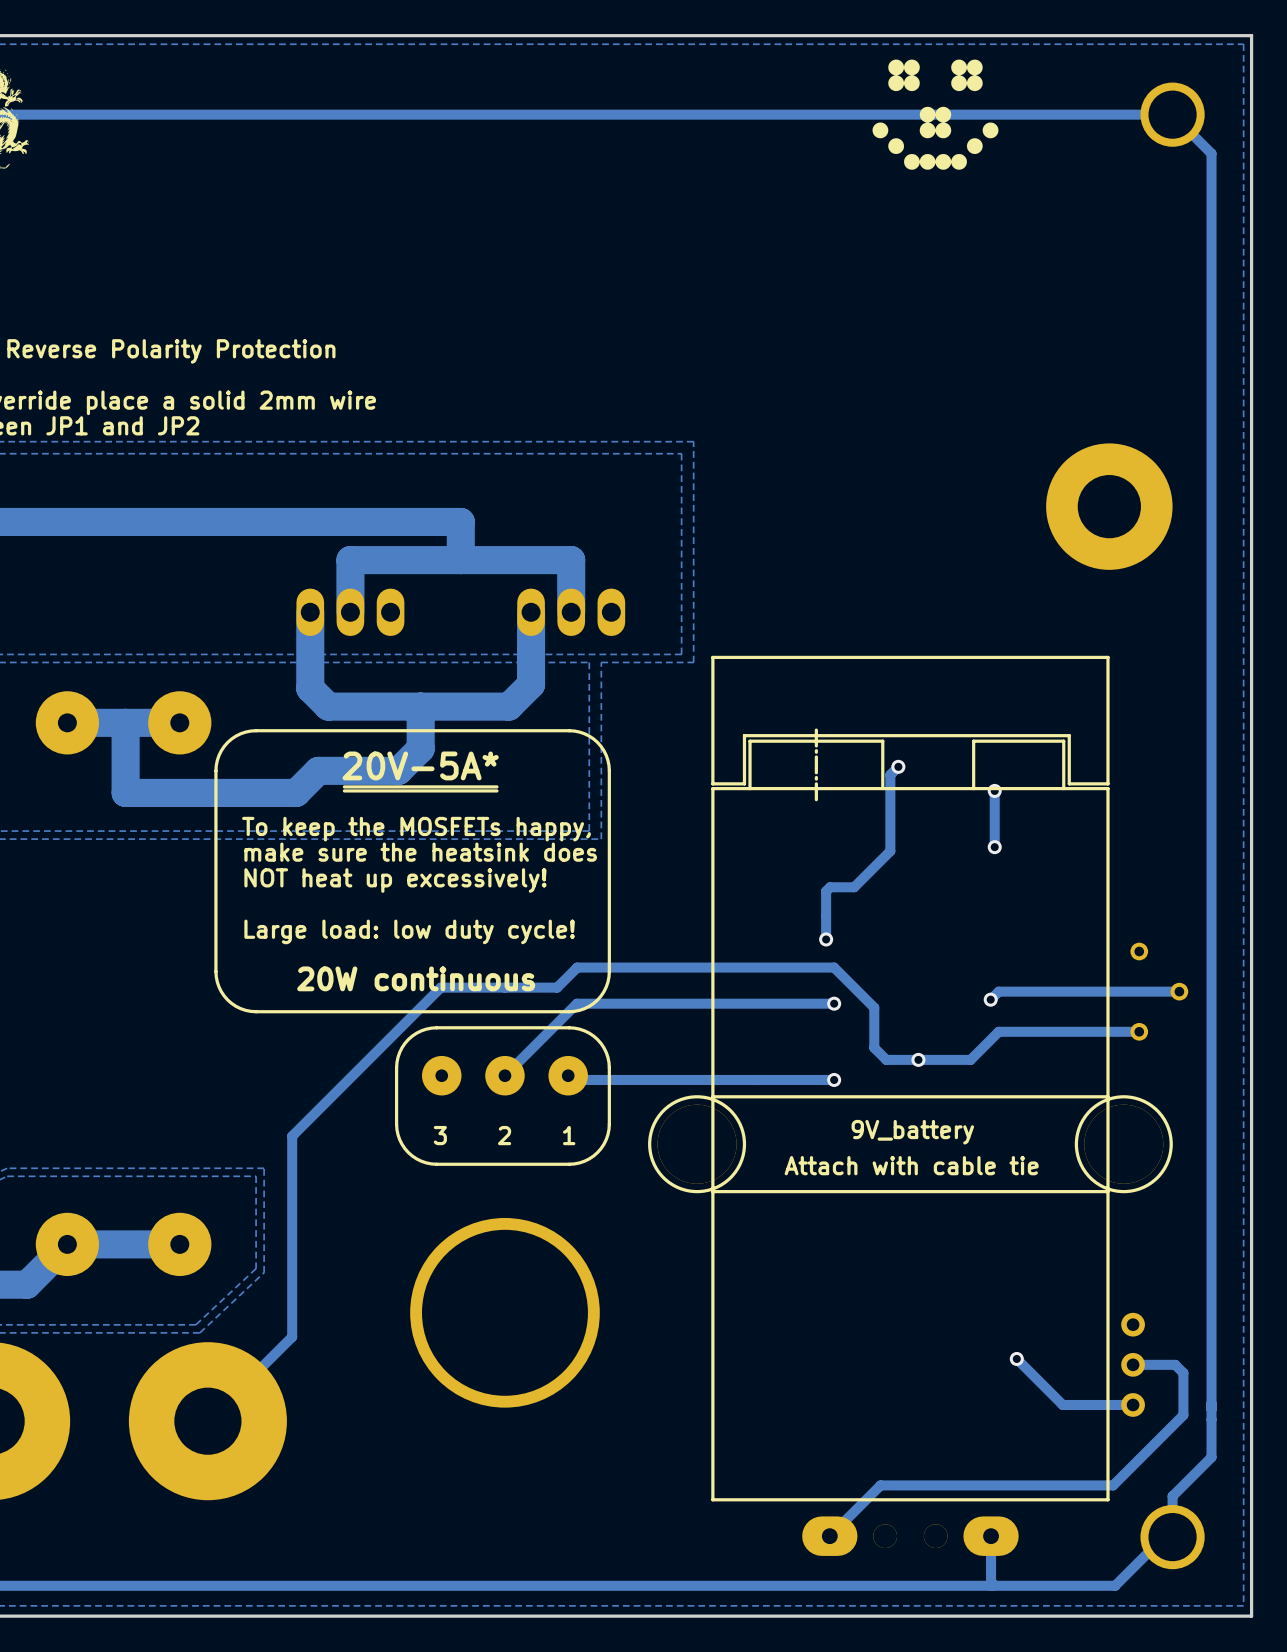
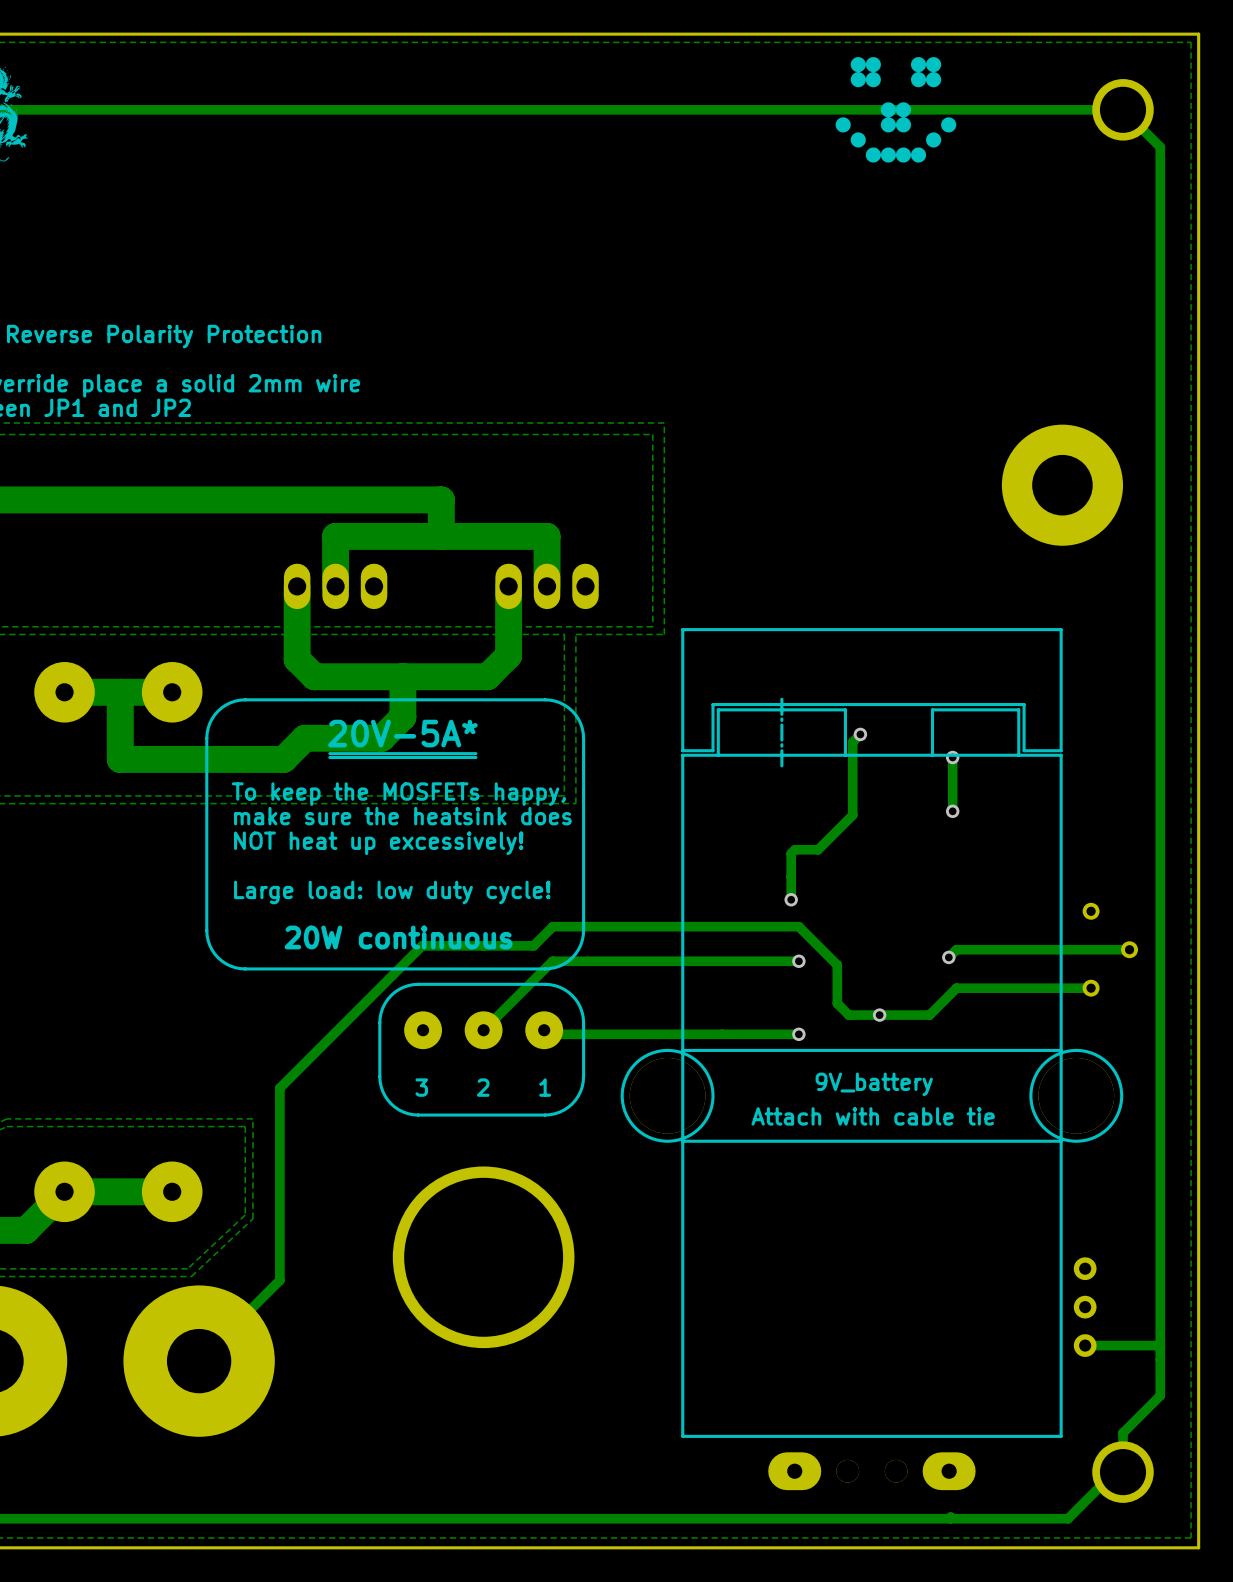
track: (1016, 1358) (1062, 1404) (1133, 1404) -> (1160, 1345) (1085, 1345)
via: (1016, 1358) -> none
track: (1133, 1364) (1175, 1364) (1183, 1373) (1183, 1415) (1113, 1485) (880, 1485) (829, 1536) -> none
track: (991, 1536) (991, 1585) (992, 1584) -> none

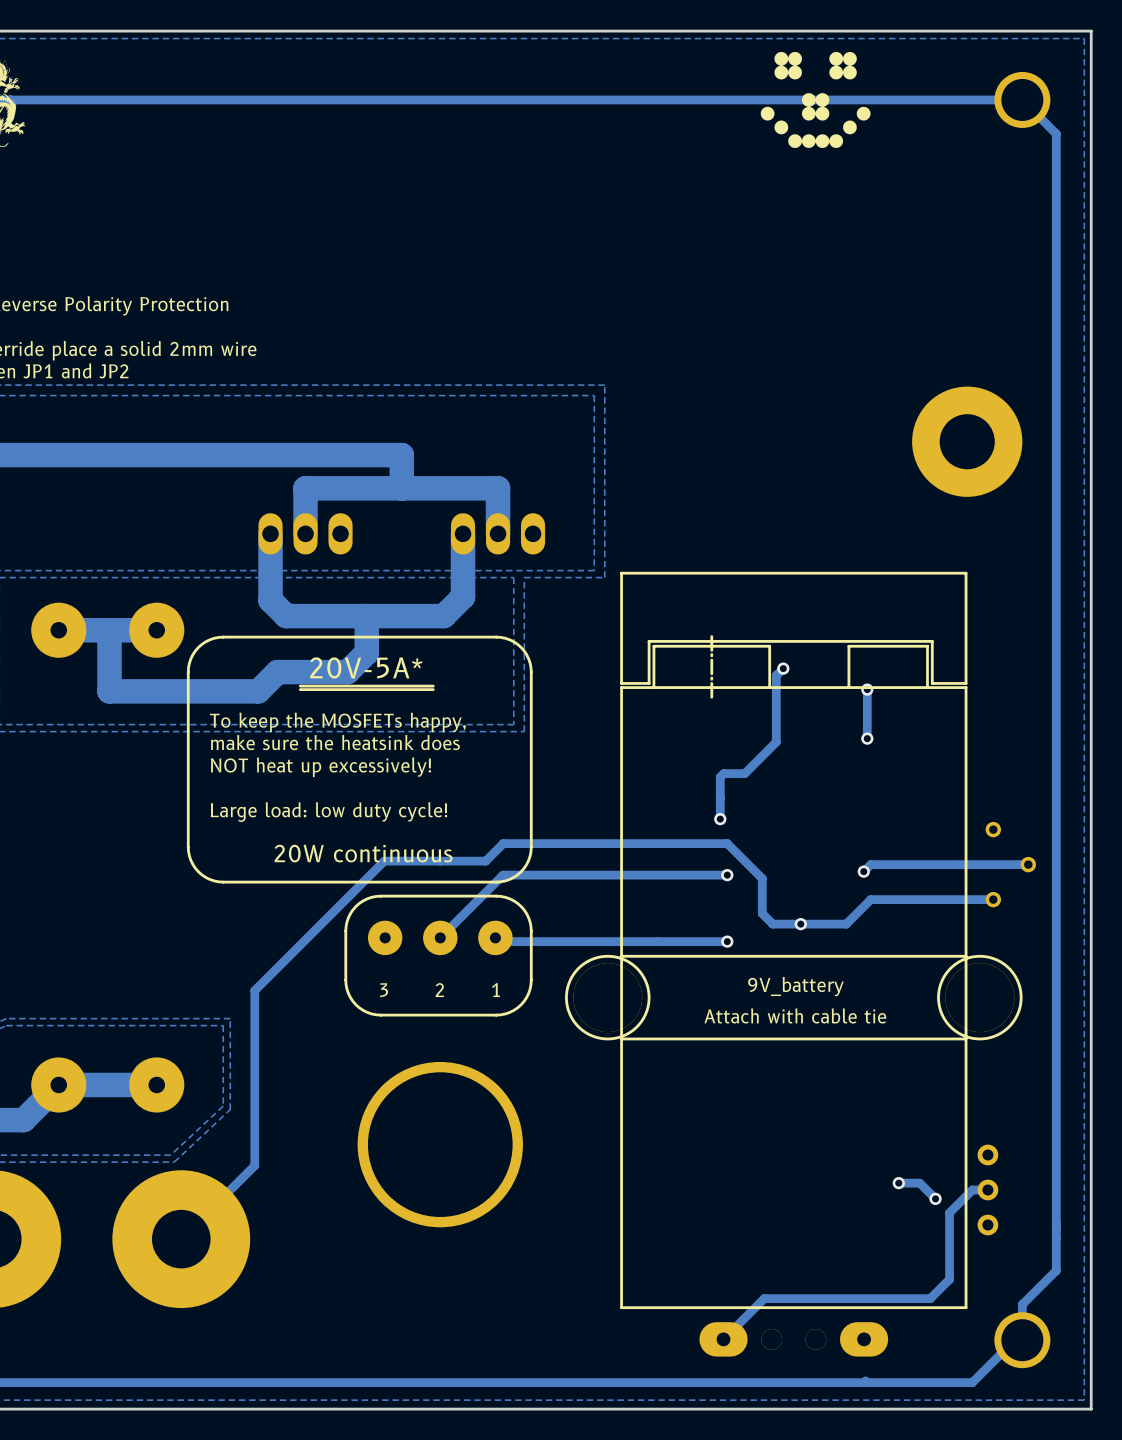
track: none -> (898, 1183) (919, 1183) (935, 1198)
via: none -> (898, 1183)
track: none -> (987, 1189) (972, 1189) (949, 1212) (949, 1279) (930, 1298) (764, 1298) (723, 1339)
via: none -> (935, 1198)
track: (1160, 1345) (1085, 1345) -> none

